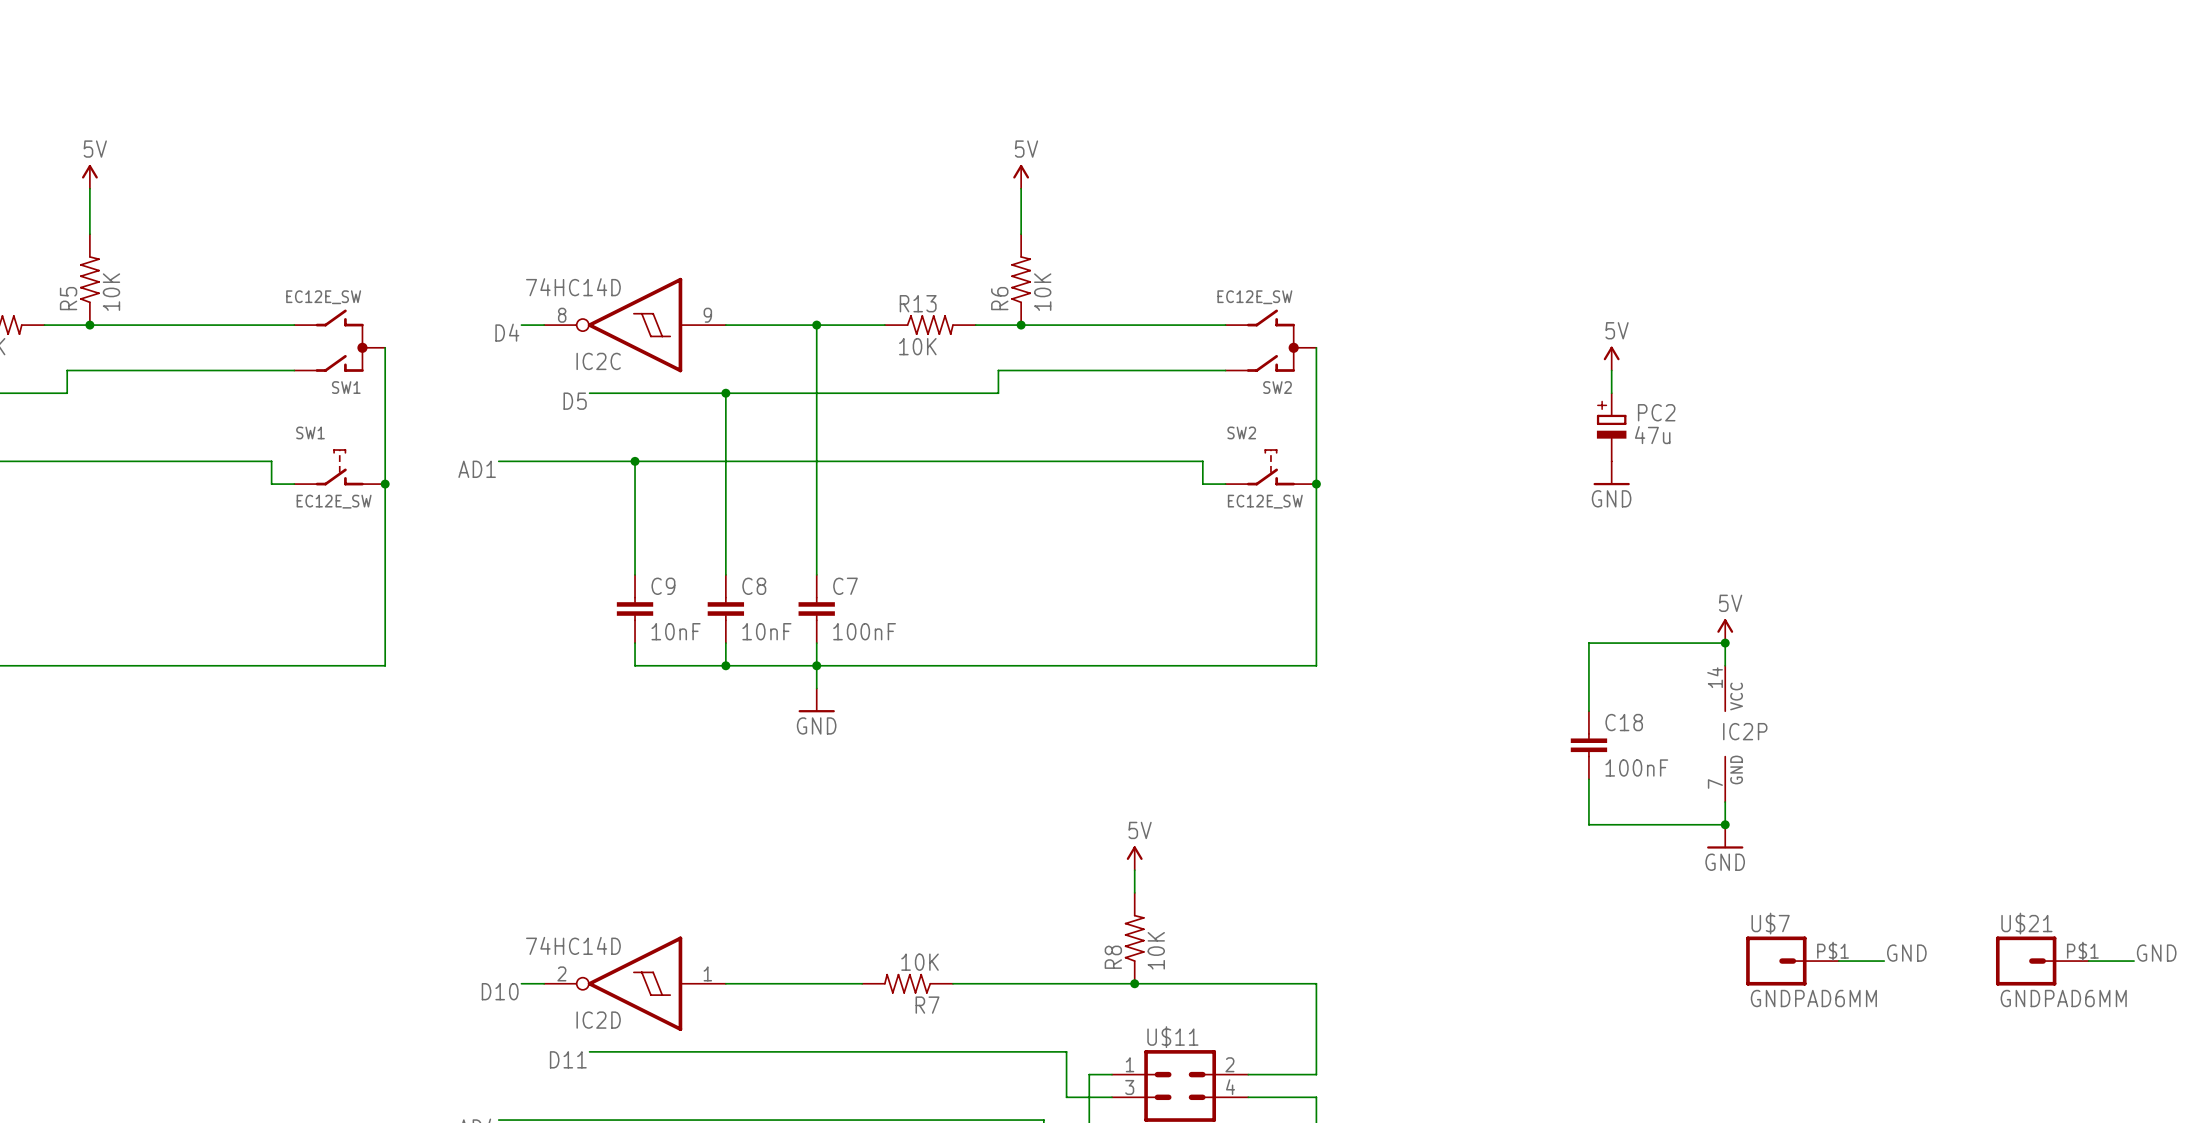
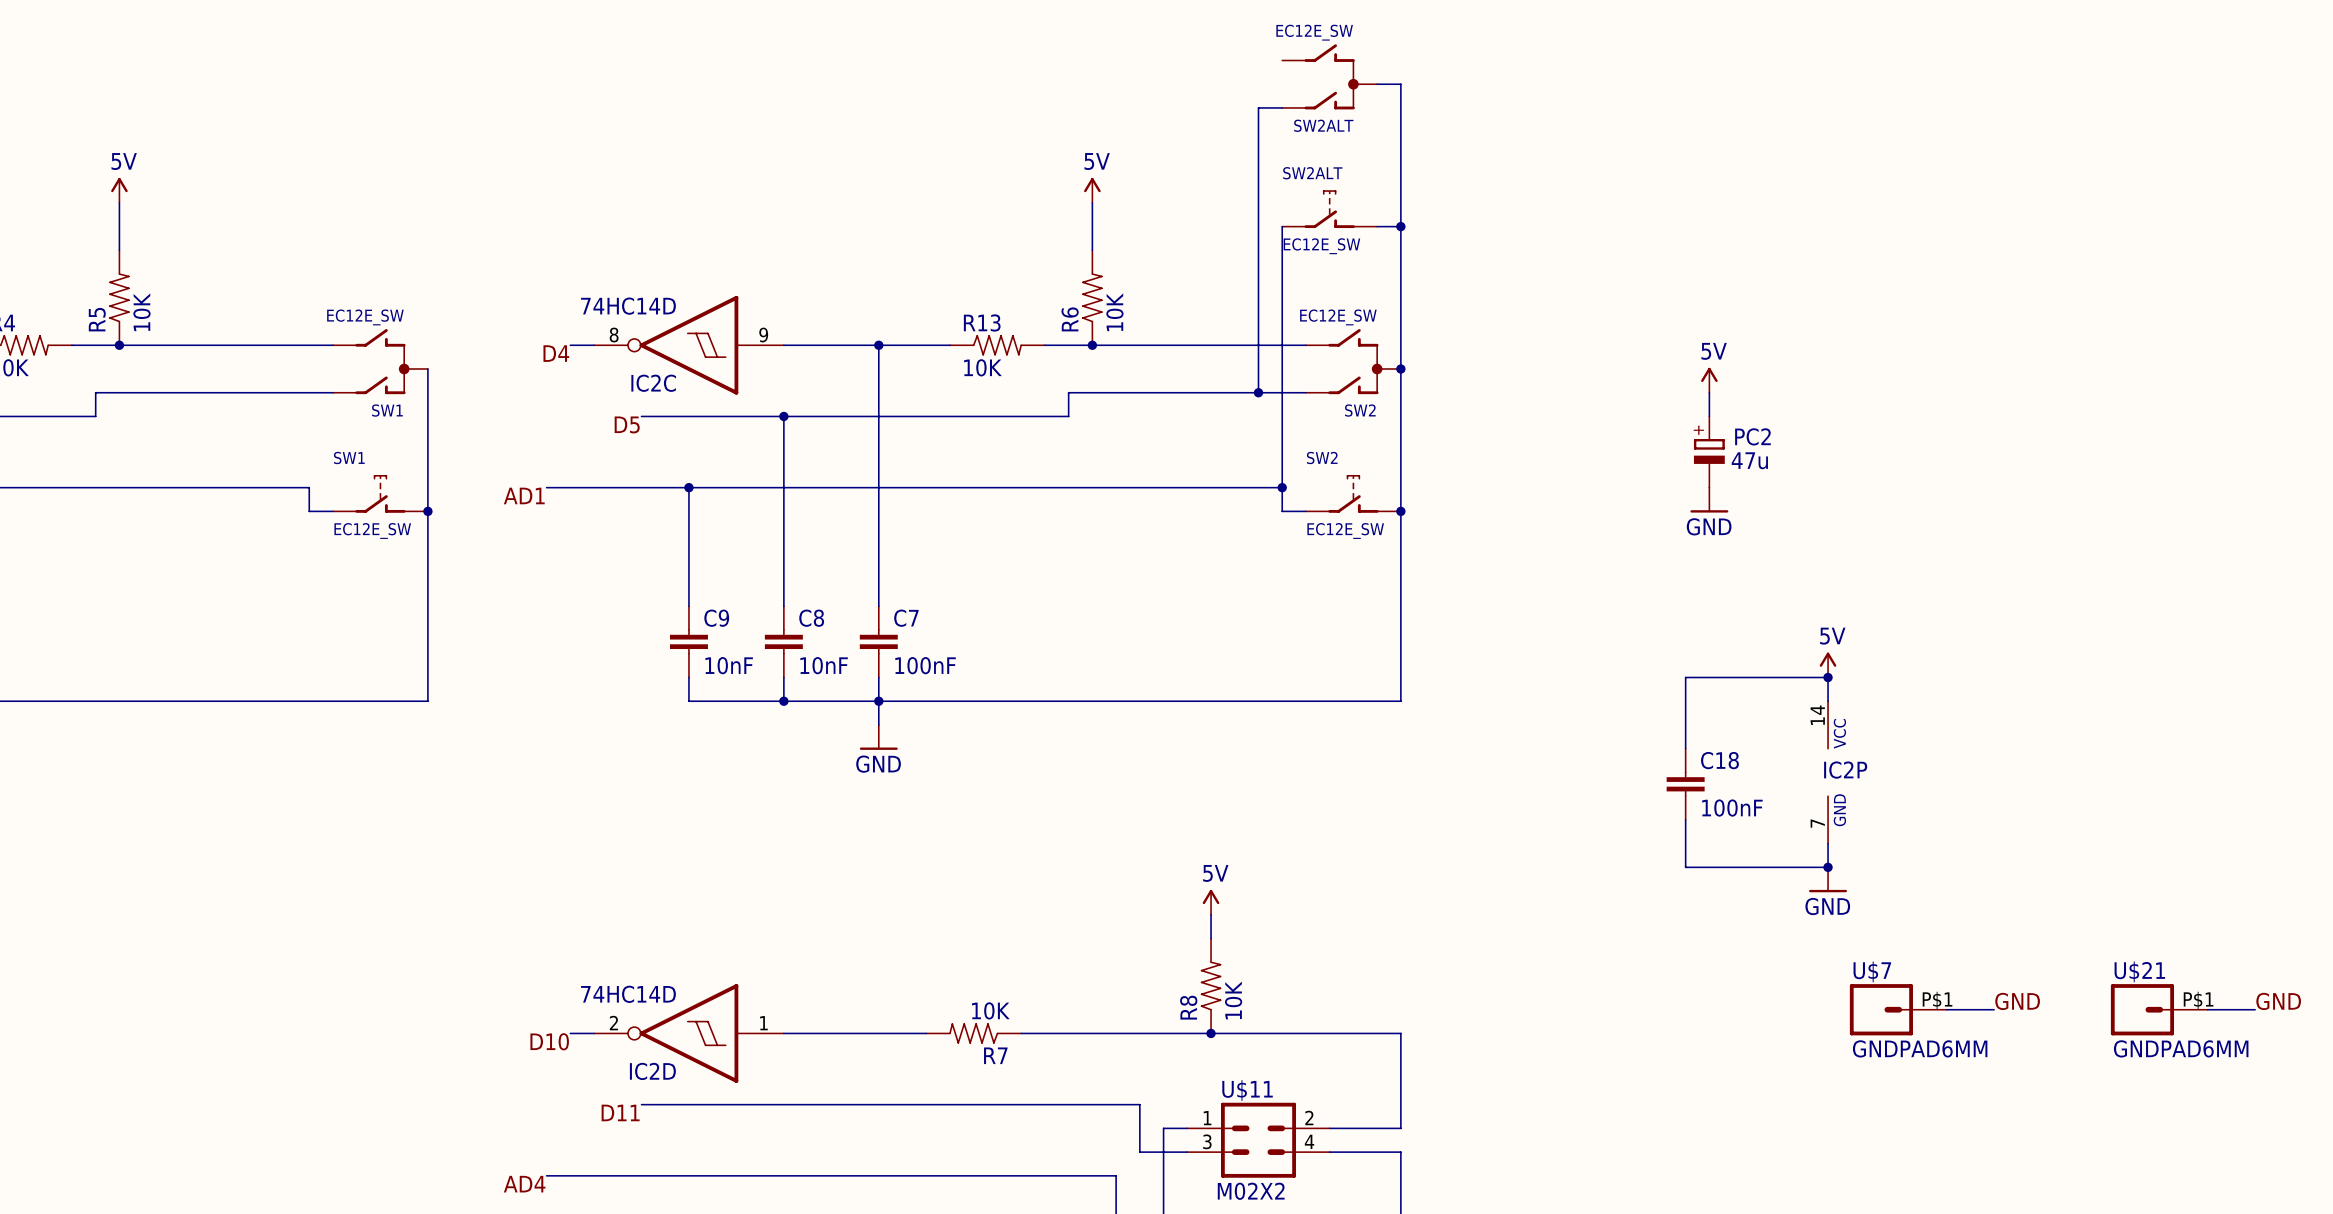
SW2ALT: none -> EC12E_SW (1329, 76)
wire: none -> (1377, 84) (1400, 84) (1400, 369)
wire: none -> (1282, 107) (1258, 107) (1258, 392)
SW2ALT: none -> EC12E_SW (1329, 209)
wire: none -> (1282, 226) (1282, 487)
wire: none -> (1377, 226) (1400, 226)
junction: none -> (1400, 226)
junction: none -> (1400, 369)
junction: none -> (1258, 392)
junction: none -> (1282, 487)

